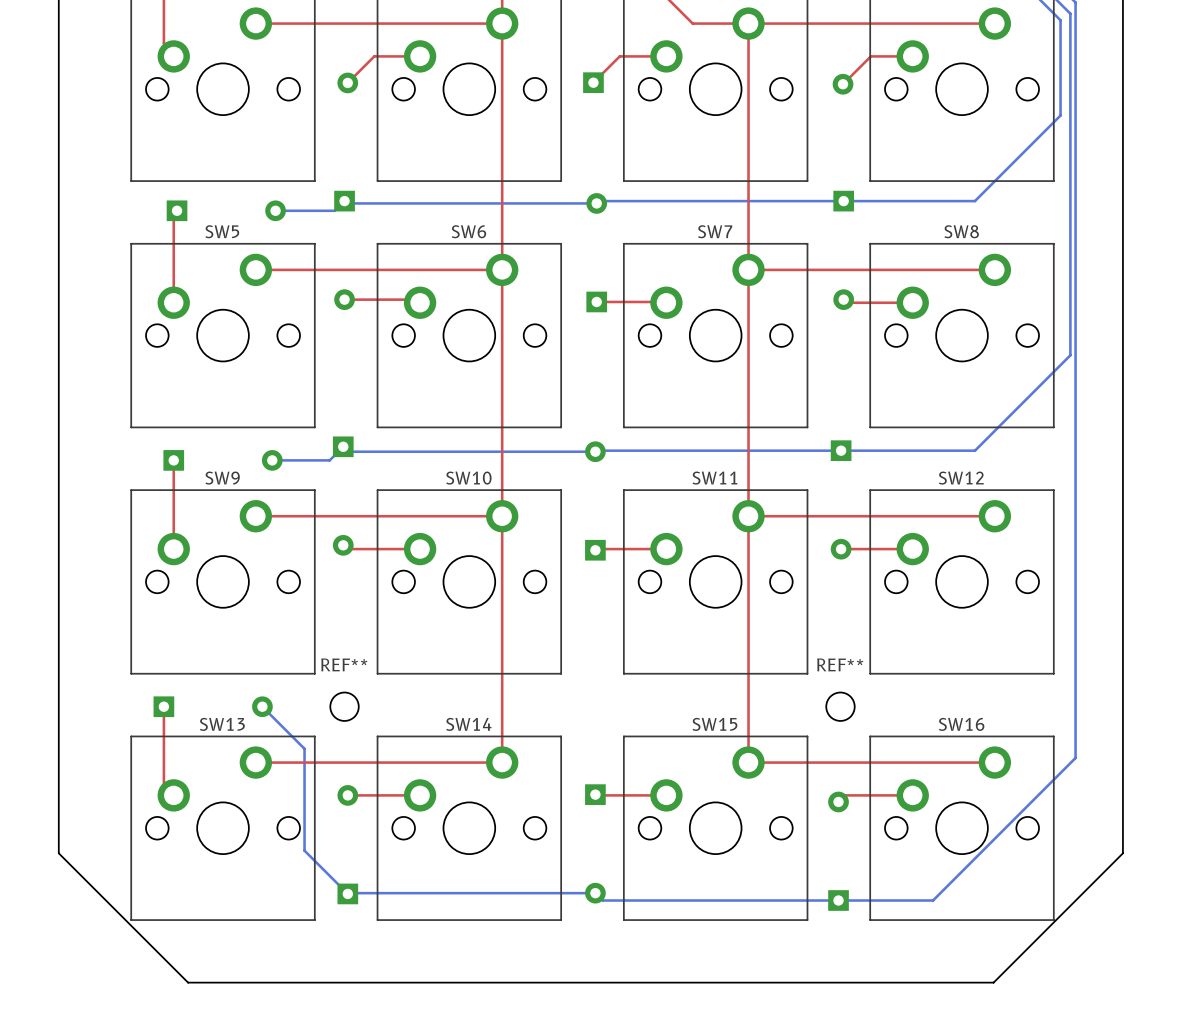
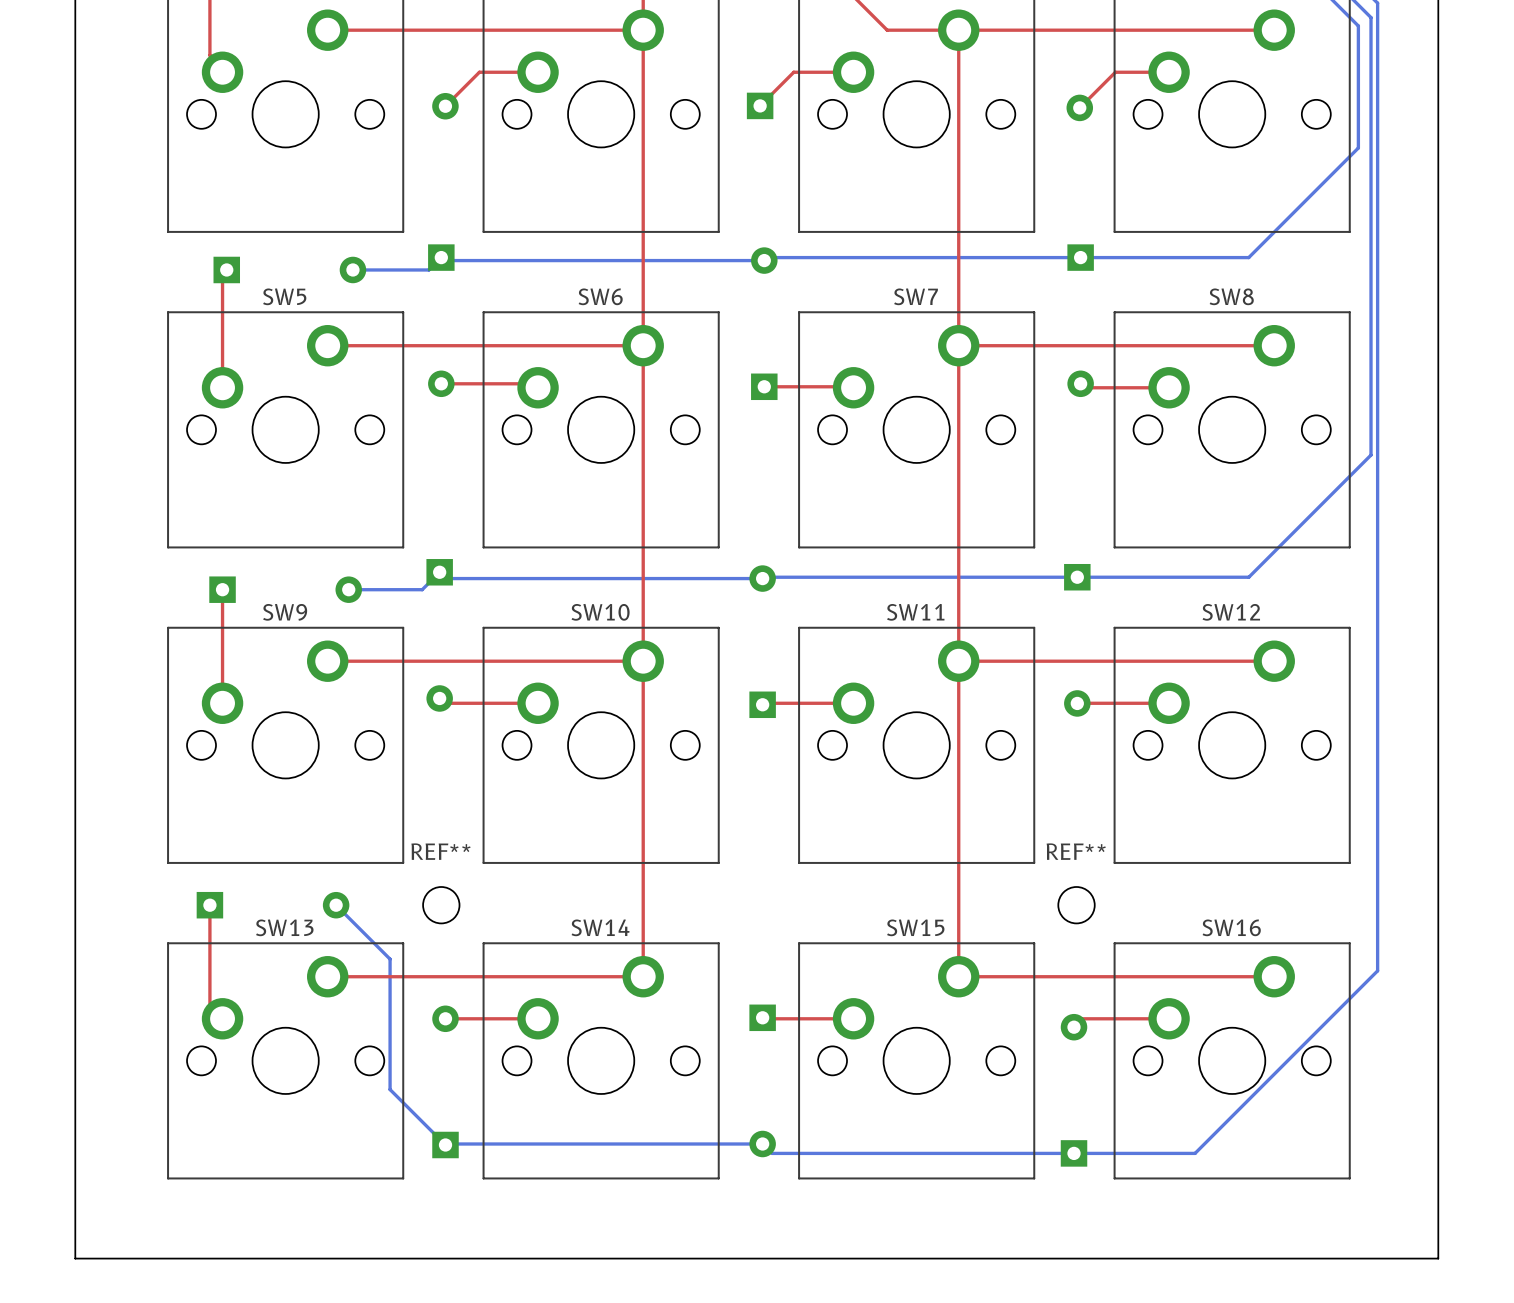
board edge: (58, 853) (188, 982) -> (75, 1092) (75, 1258) (240, 1258)
board edge: (1122, 853) (993, 982) -> (1438, 1092) (1438, 1258) (1272, 1258)

